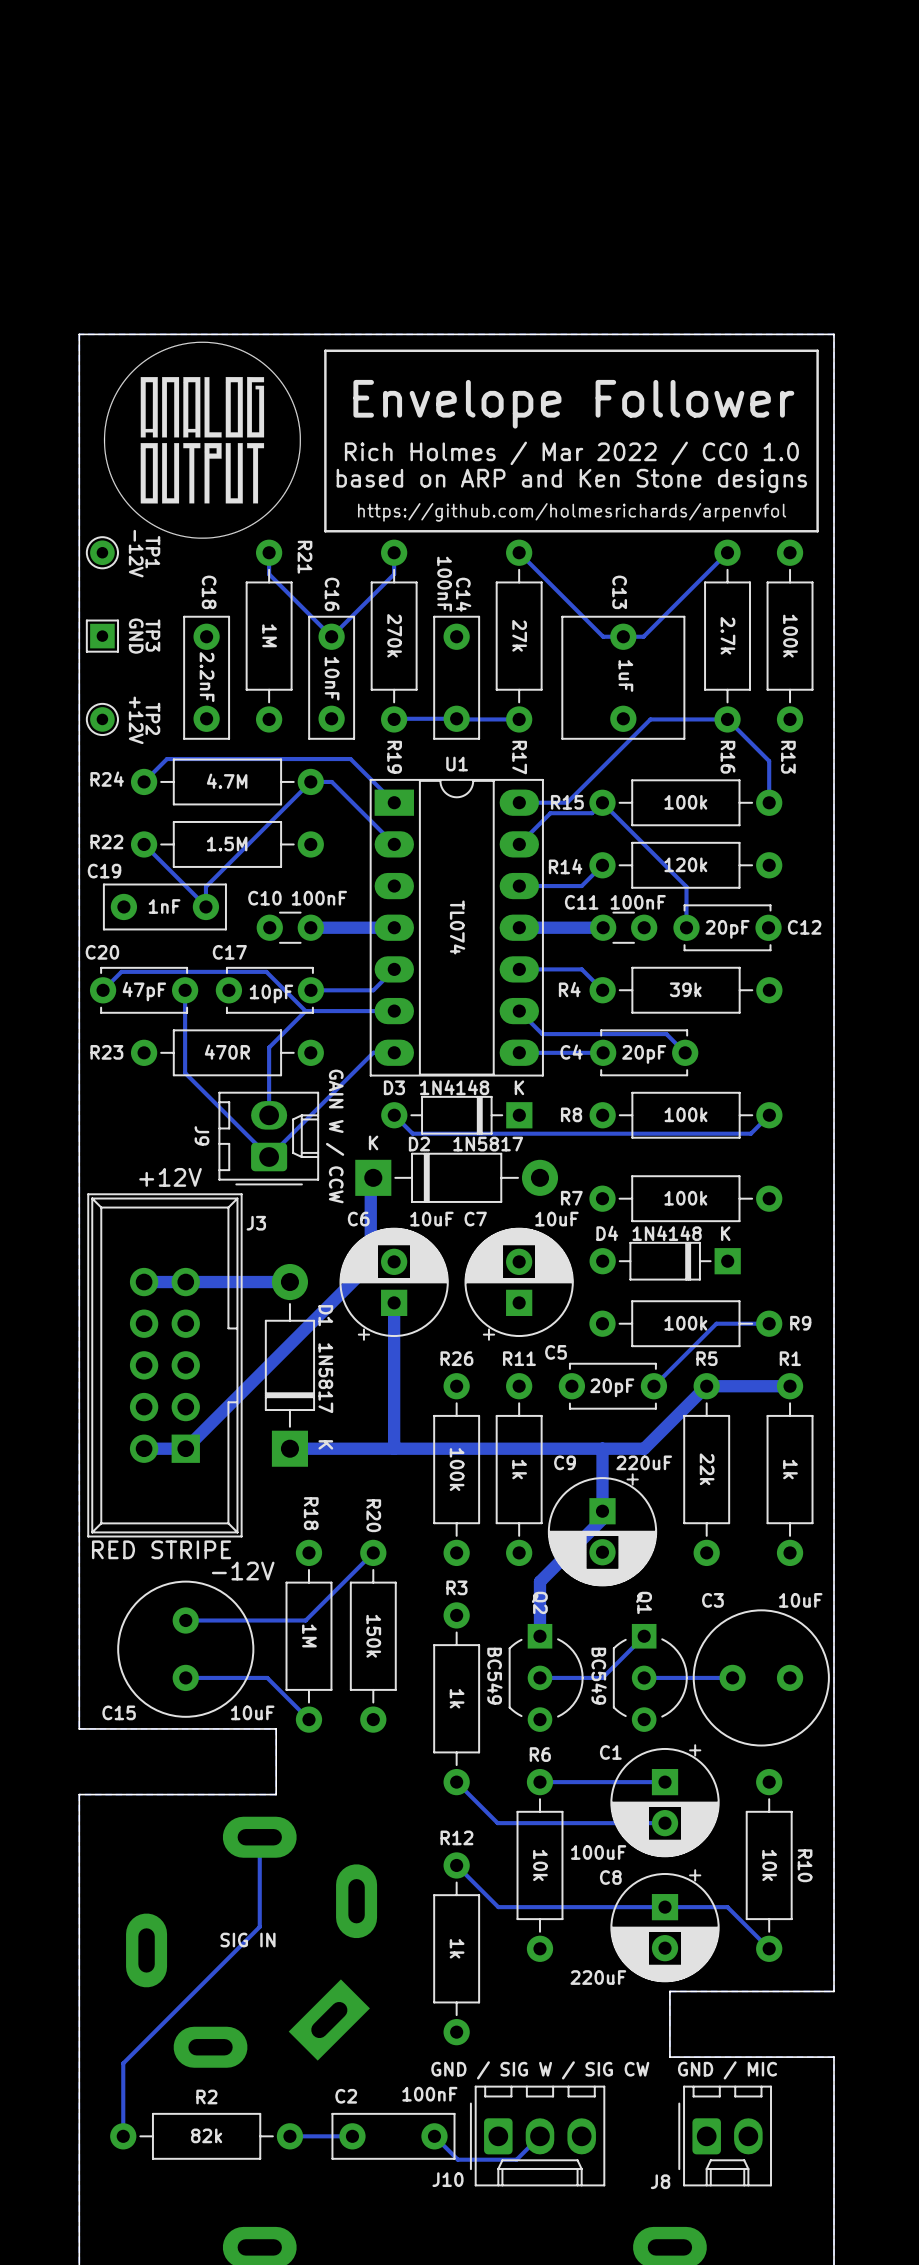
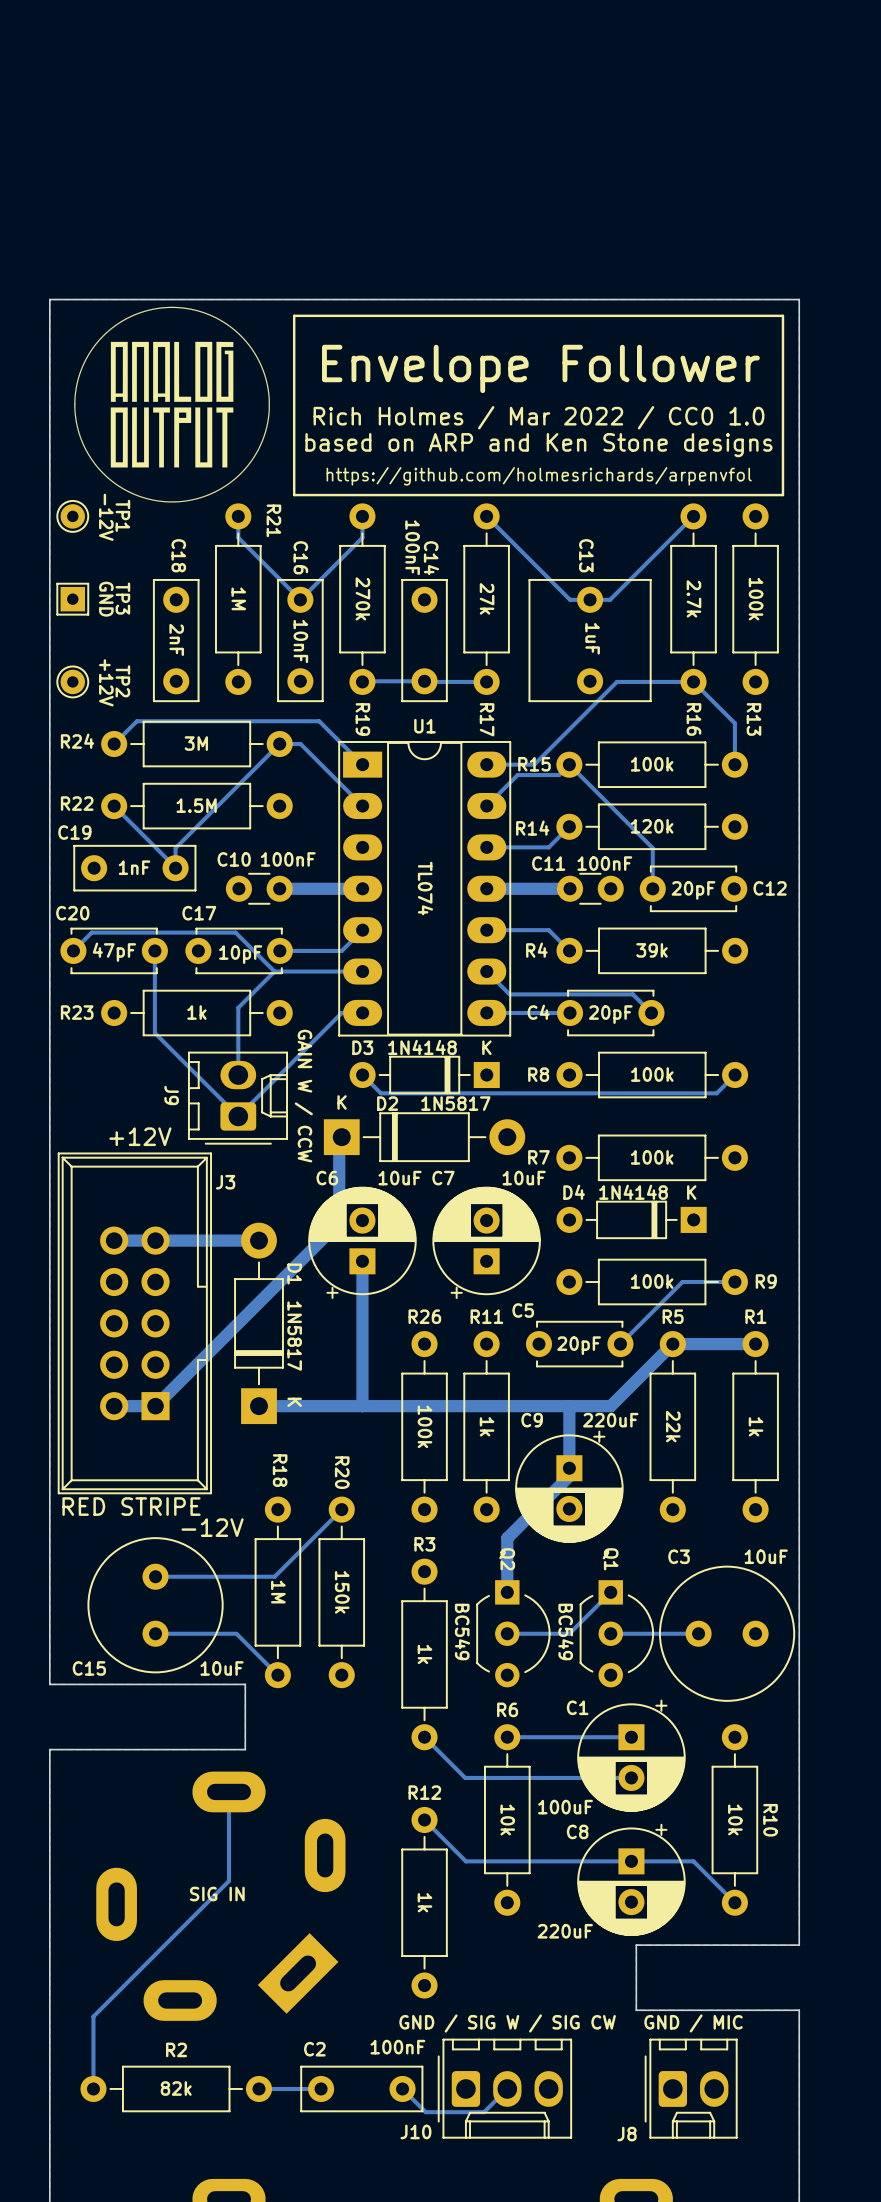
C18 value: 2.2nF (207, 677) -> 2nF (176, 639)
R24 value: 4.7M (227, 781) -> 3M (196, 743)
R23 value: 470R (227, 1052) -> 1k (196, 1012)

